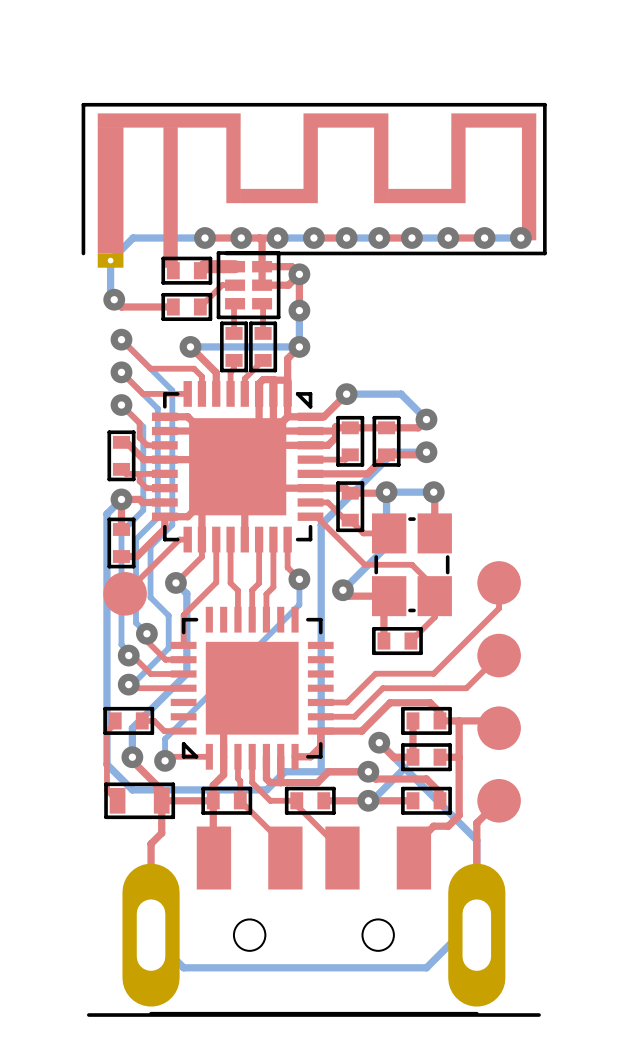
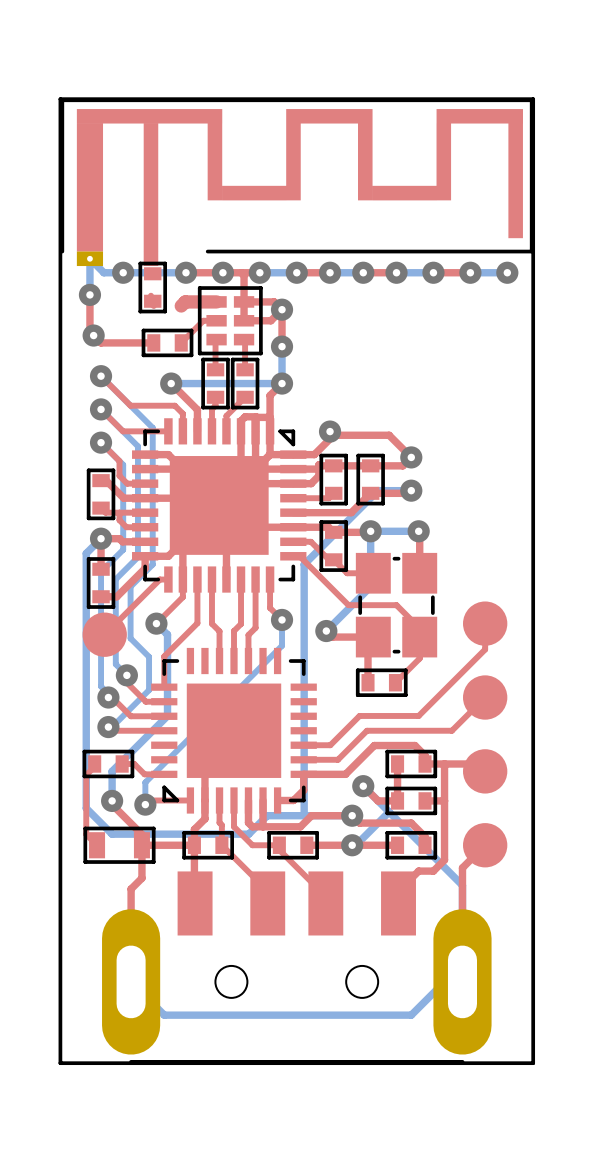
part position: (314, 185) -> (297, 182)
bottom track: (133, 238) (110, 260) (110, 296) (114, 299) -> (112, 272) (103, 272) (89, 258) (89, 294)
via: none -> (123, 272)
top track: none -> (89, 294) (89, 331) (93, 335)
via: none -> (89, 294)
part rotation: 0° (186, 270) -> 90° clockwise (152, 287)
top track: (346, 394) (323, 416) -> (411, 457) (389, 435) (333, 435) (314, 454) (306, 454)
bottom track: (346, 394) (401, 394) (426, 419) -> none
board edge: none -> (67, 1063) (60, 1063) (60, 99) (533, 99) (533, 1063) (525, 1063)

